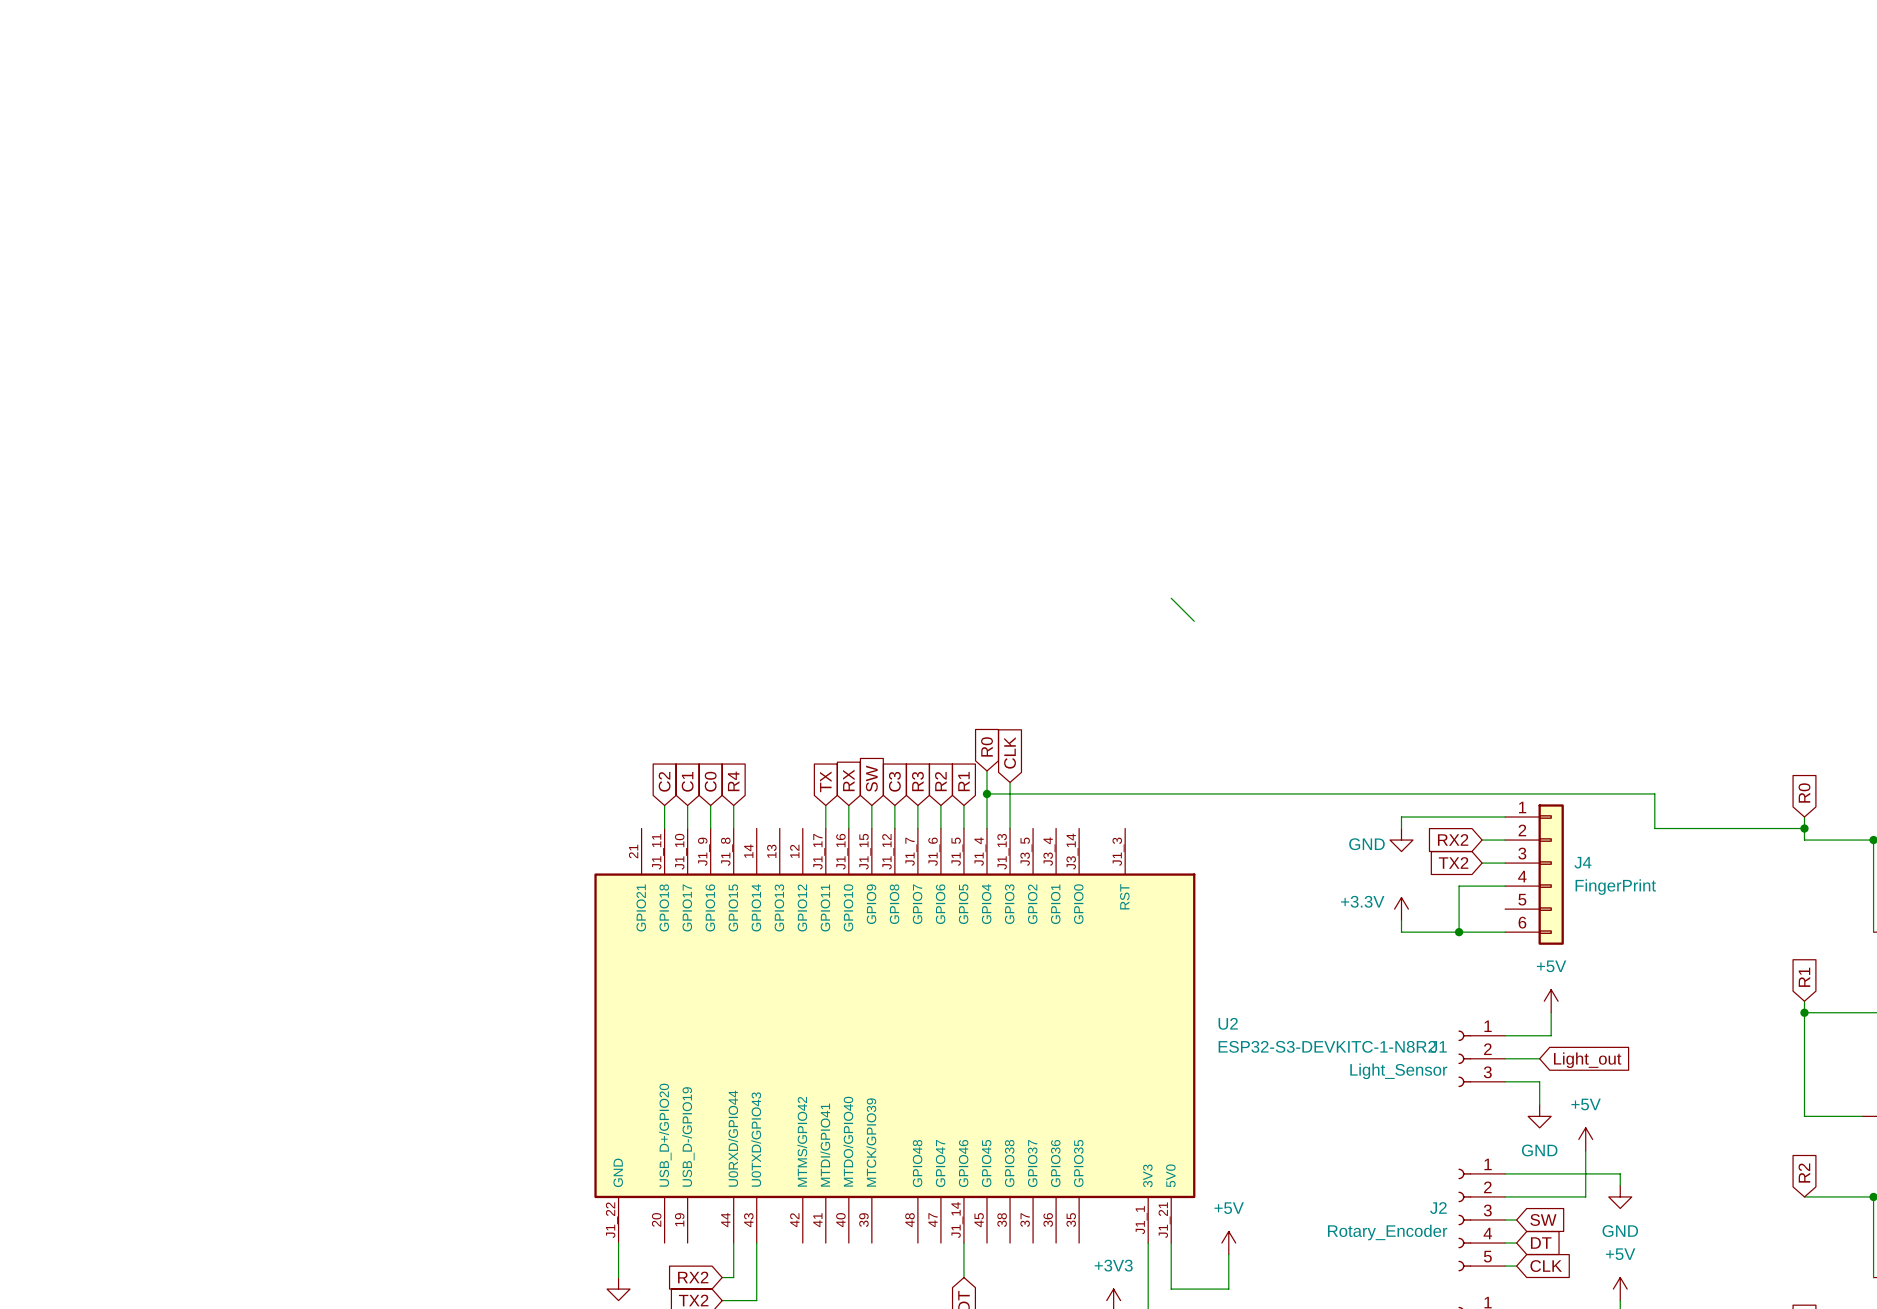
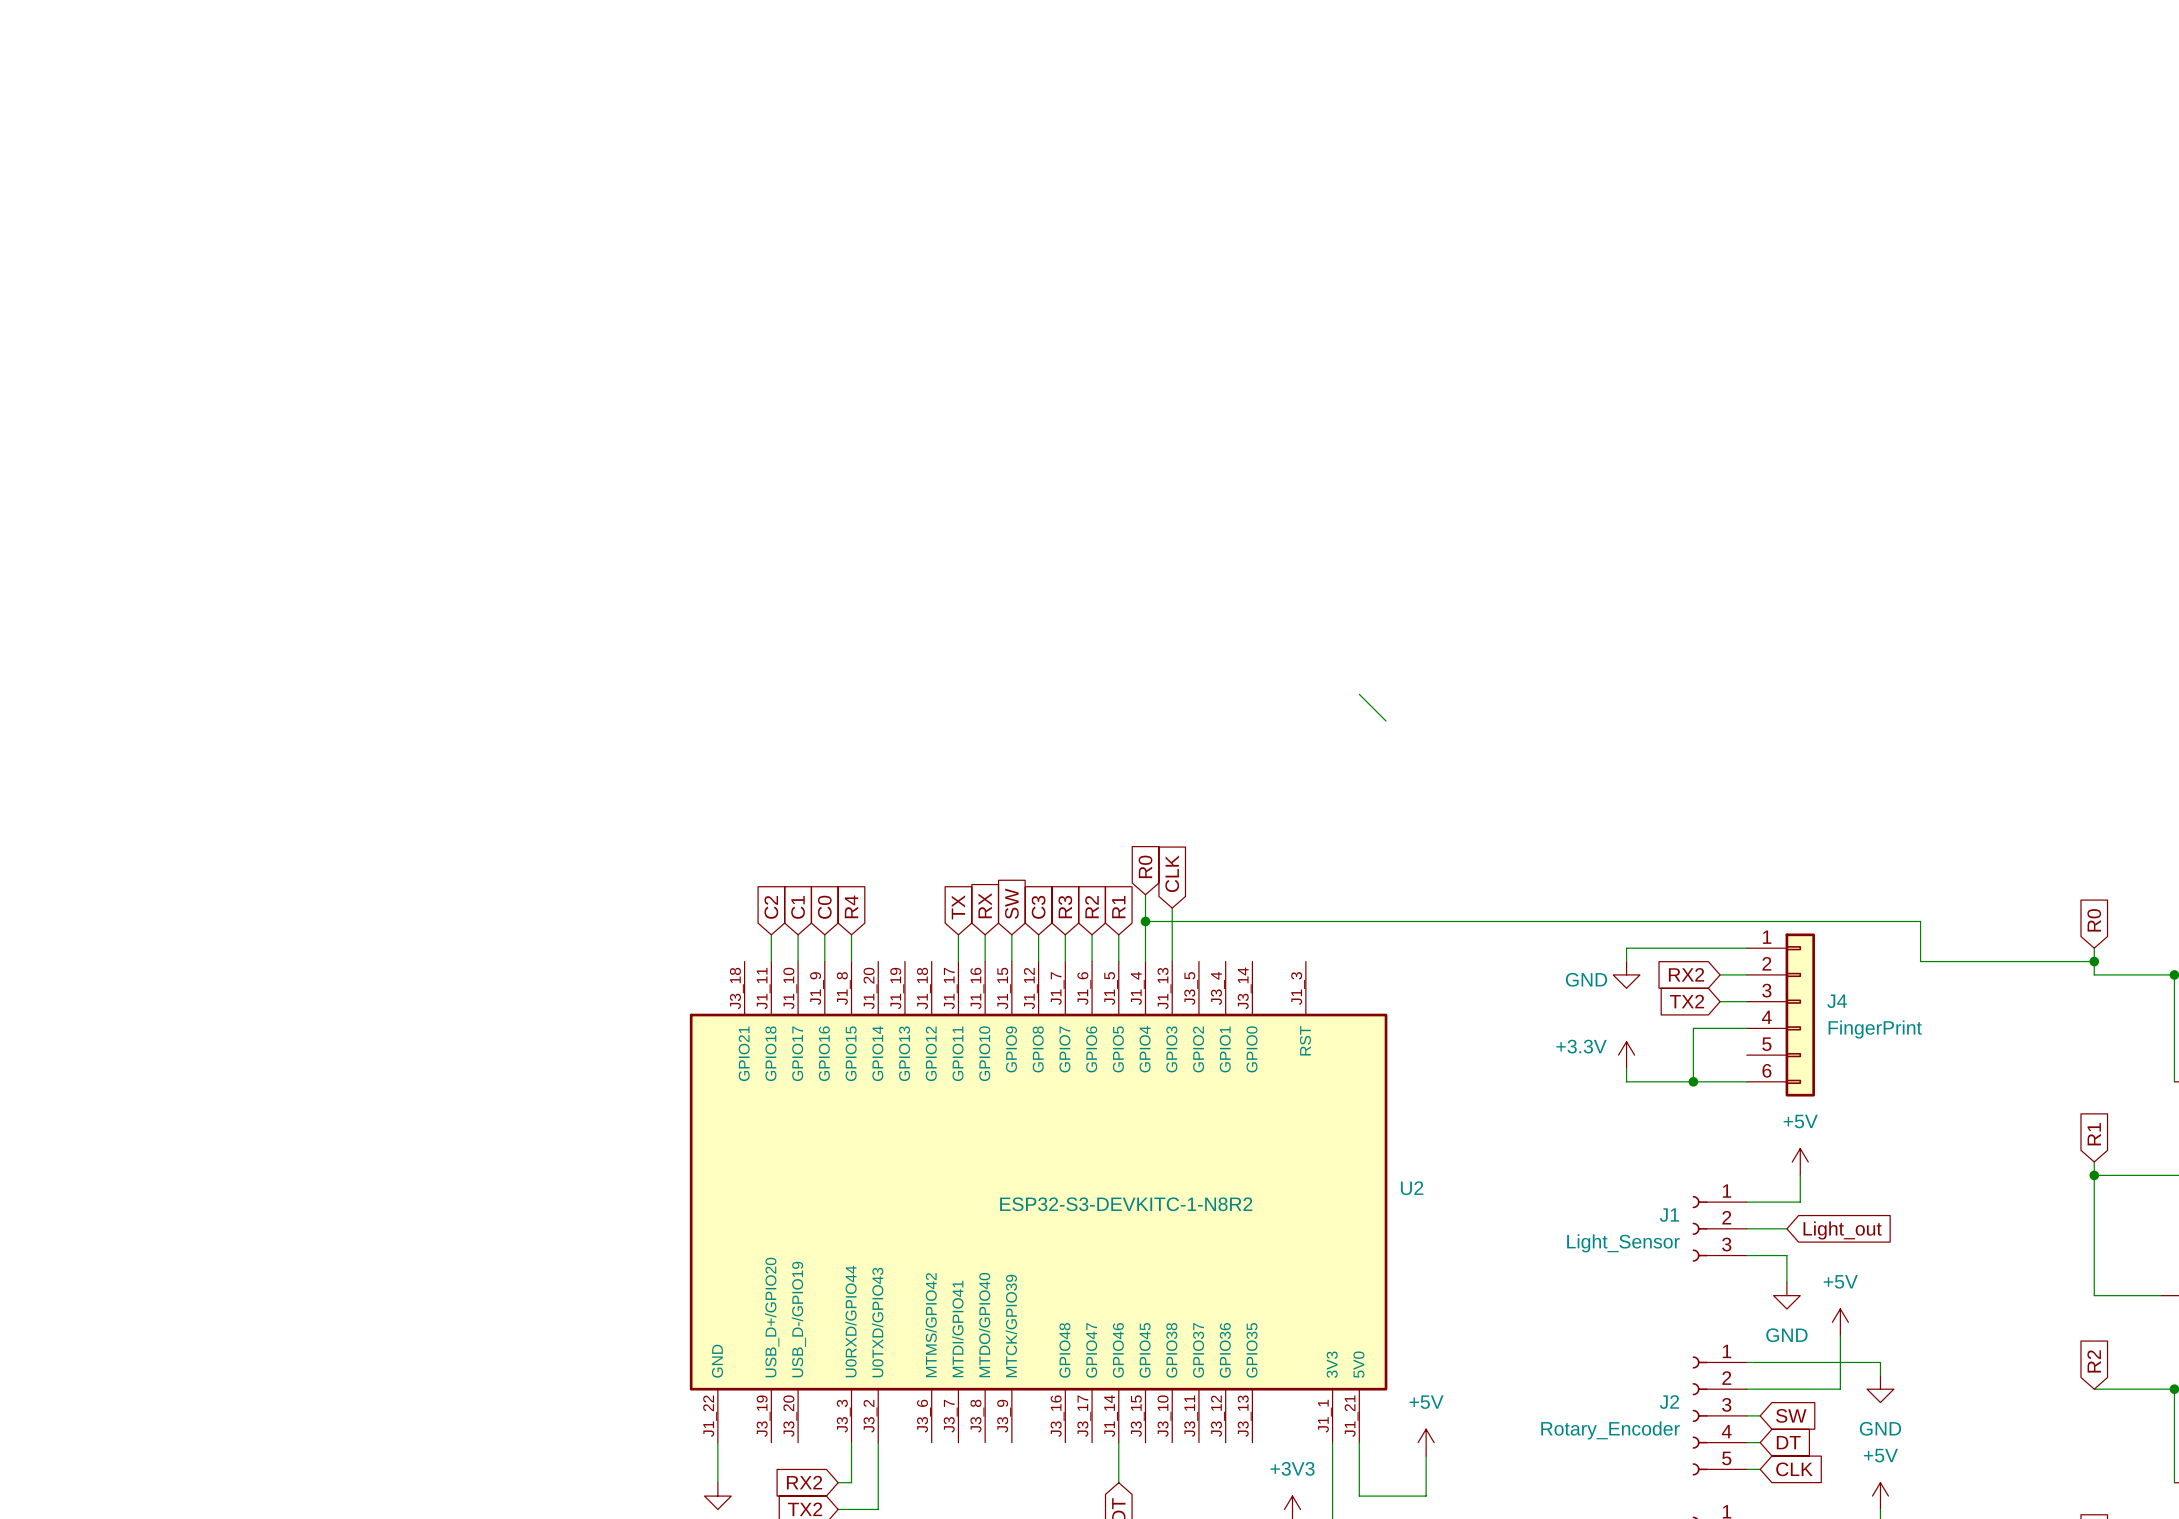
U2 symbol: [594, 828, 1196, 1244] -> [689, 961, 1388, 1443]
U2 value position: ESP32-S3-DEVKITC-1-N8R2 (1327, 1046) -> ESP32-S3-DEVKITC-1-N8R2 (1126, 1204)

